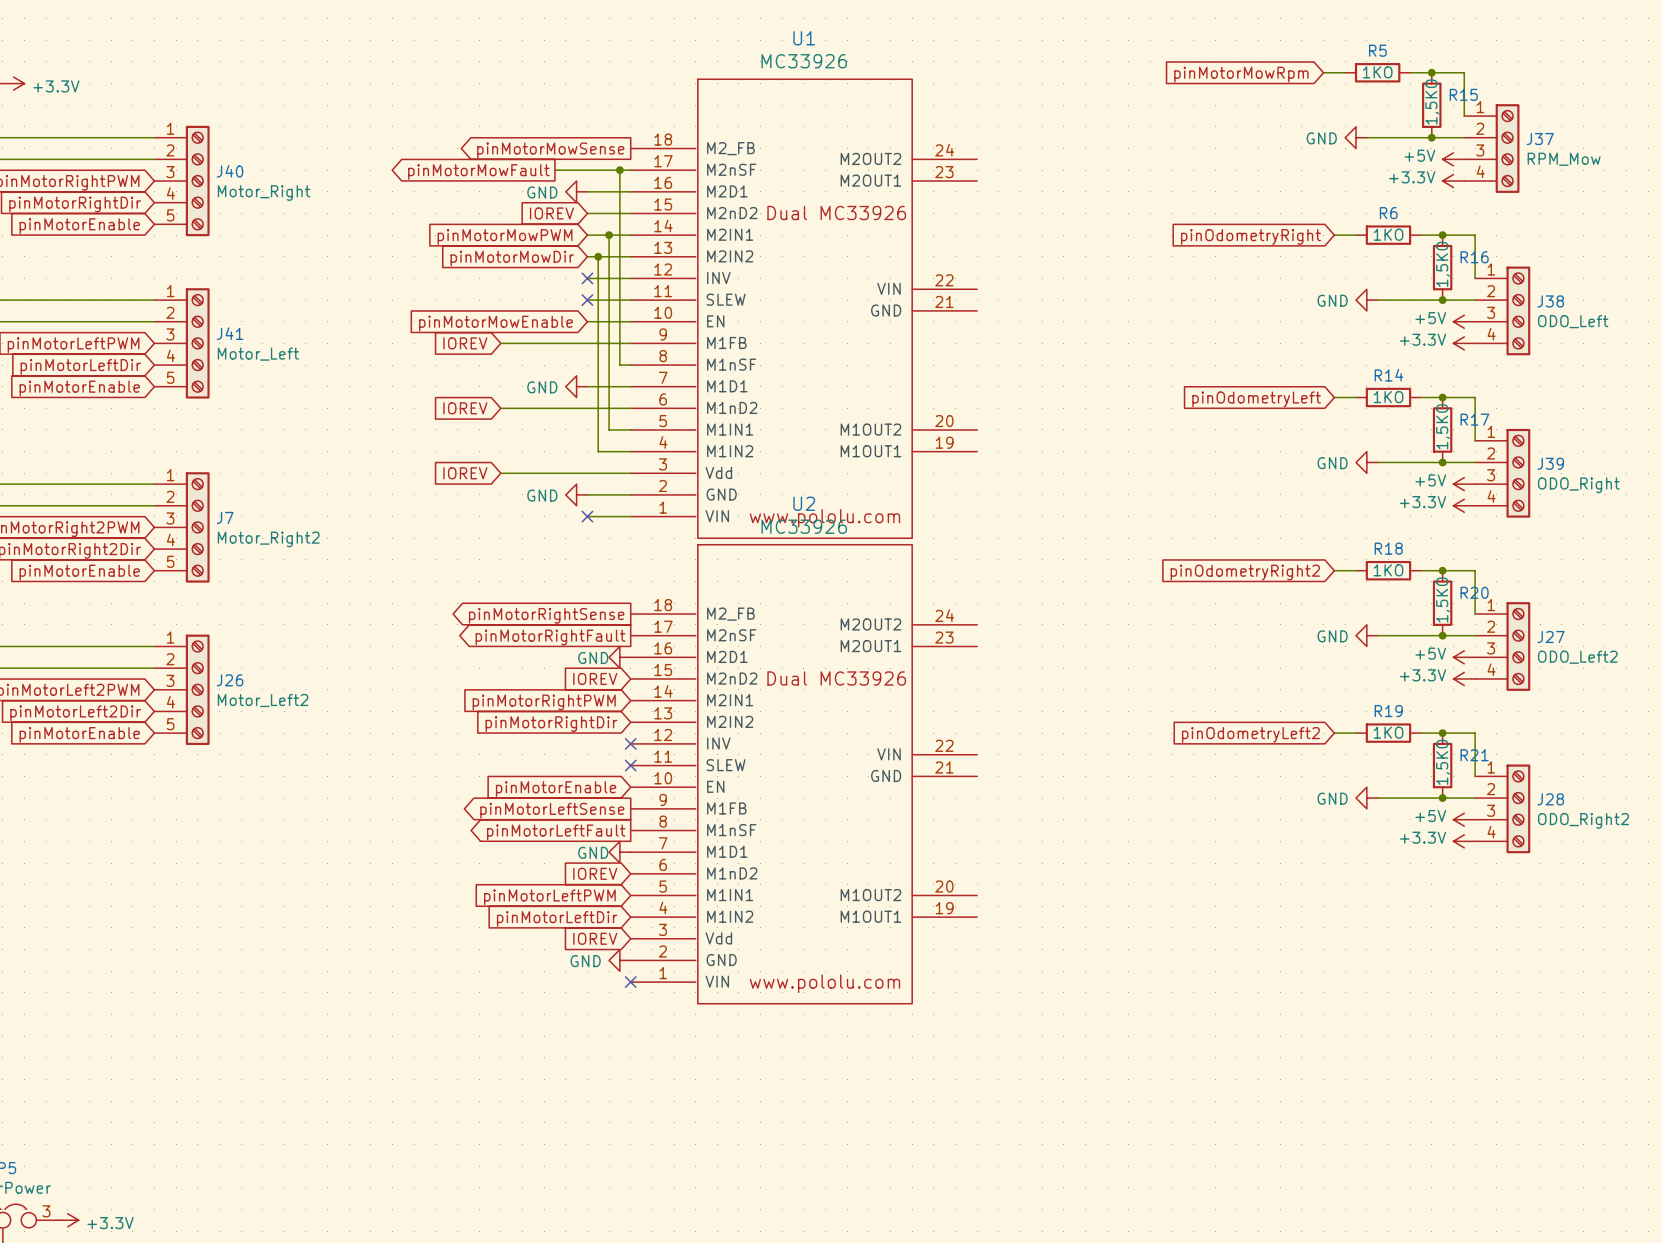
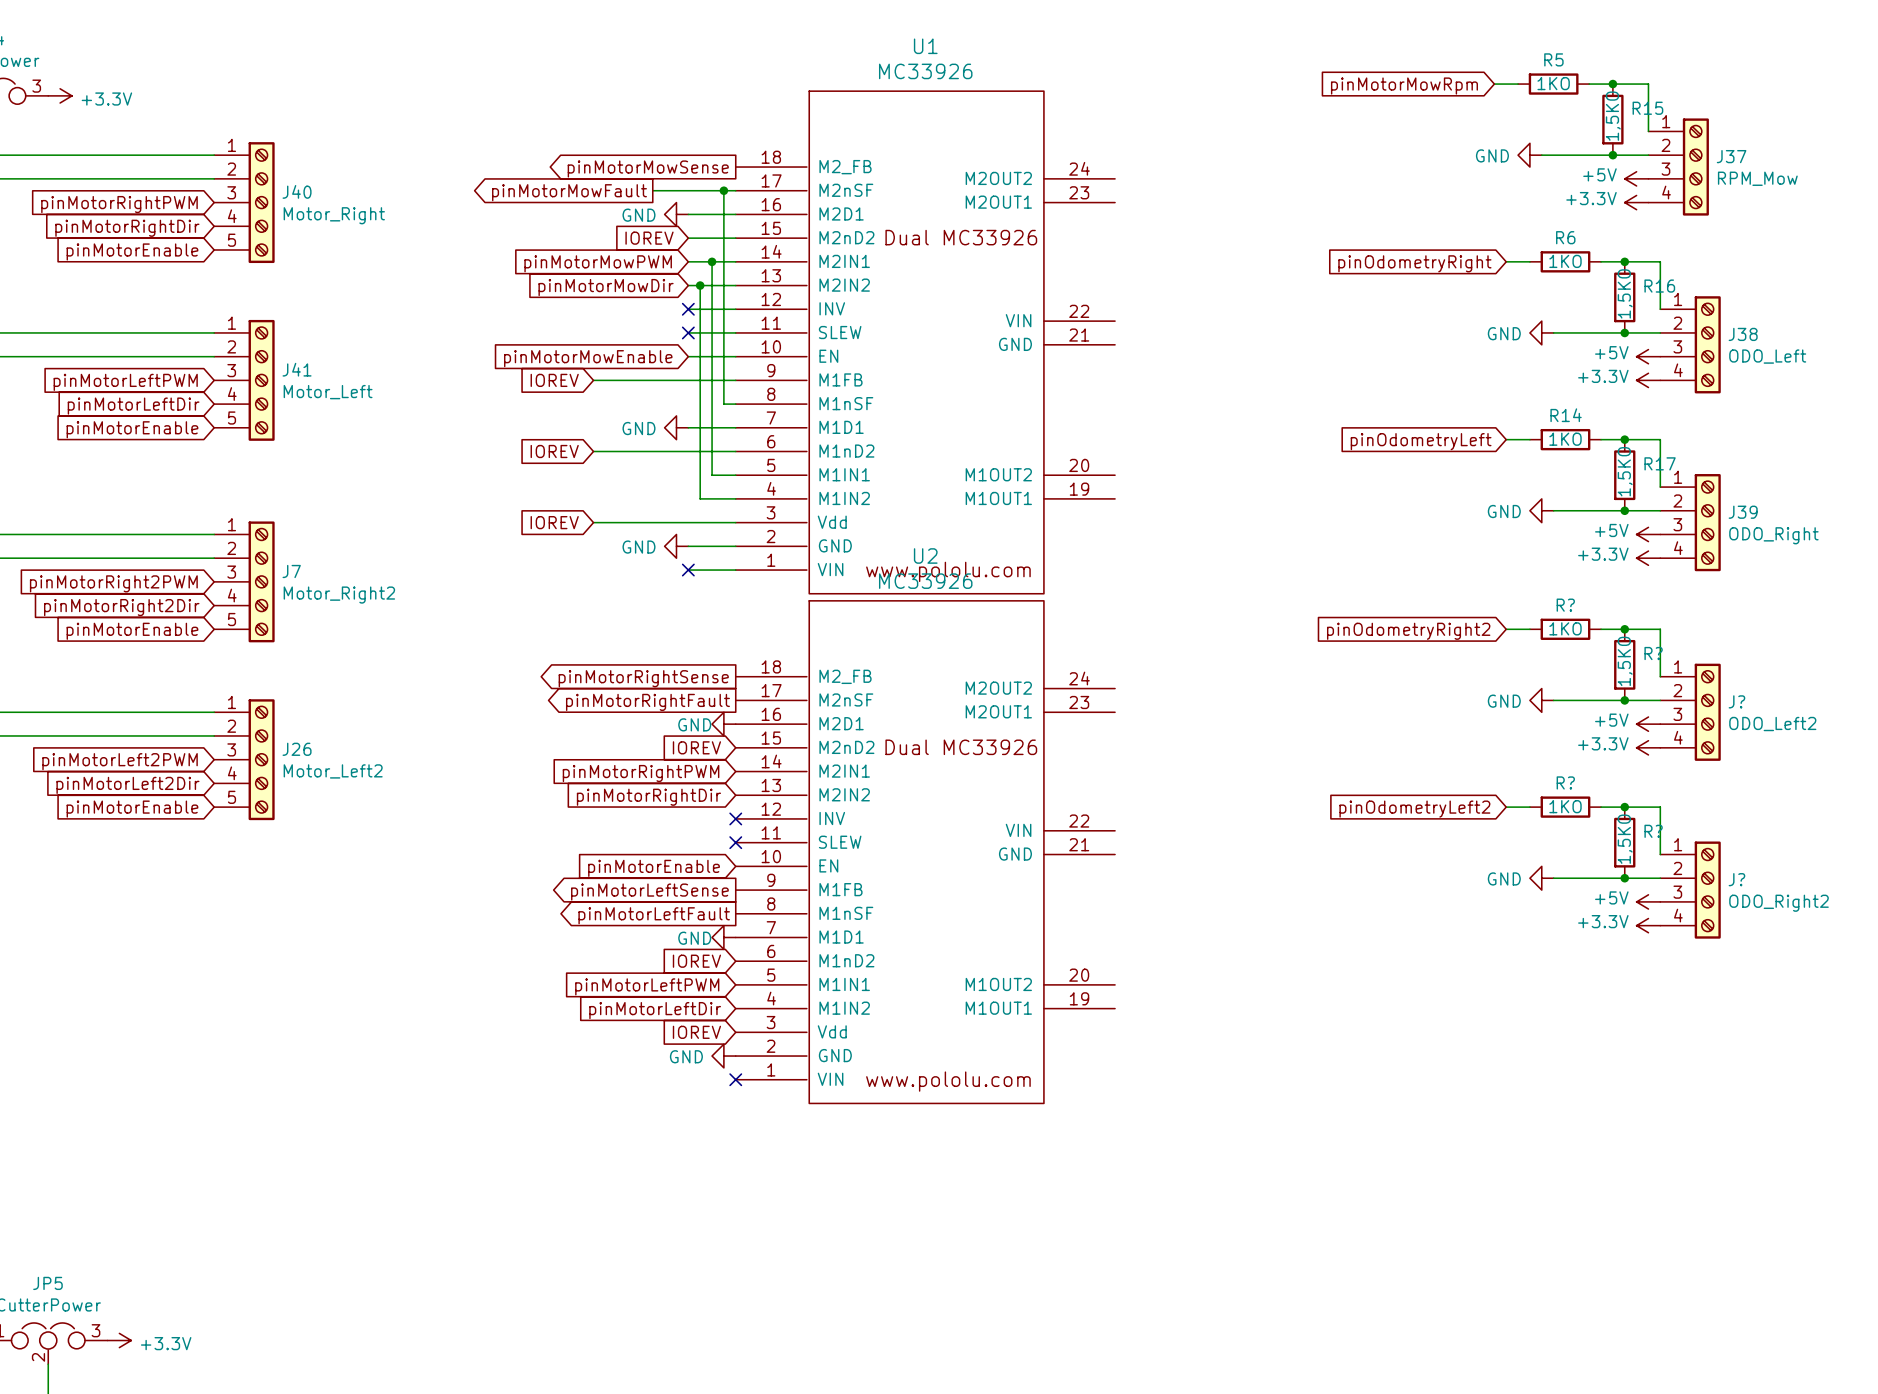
R18 name: R18 (1388, 548) -> R? (1565, 605)
R20 name: R20 (1474, 592) -> R? (1653, 653)
J27 name: J27 (1551, 637) -> J? (1736, 701)
R19 name: R19 (1388, 711) -> R? (1565, 782)
R21 name: R21 (1474, 755) -> R? (1653, 831)
J28 name: J28 (1550, 799) -> J? (1736, 879)

